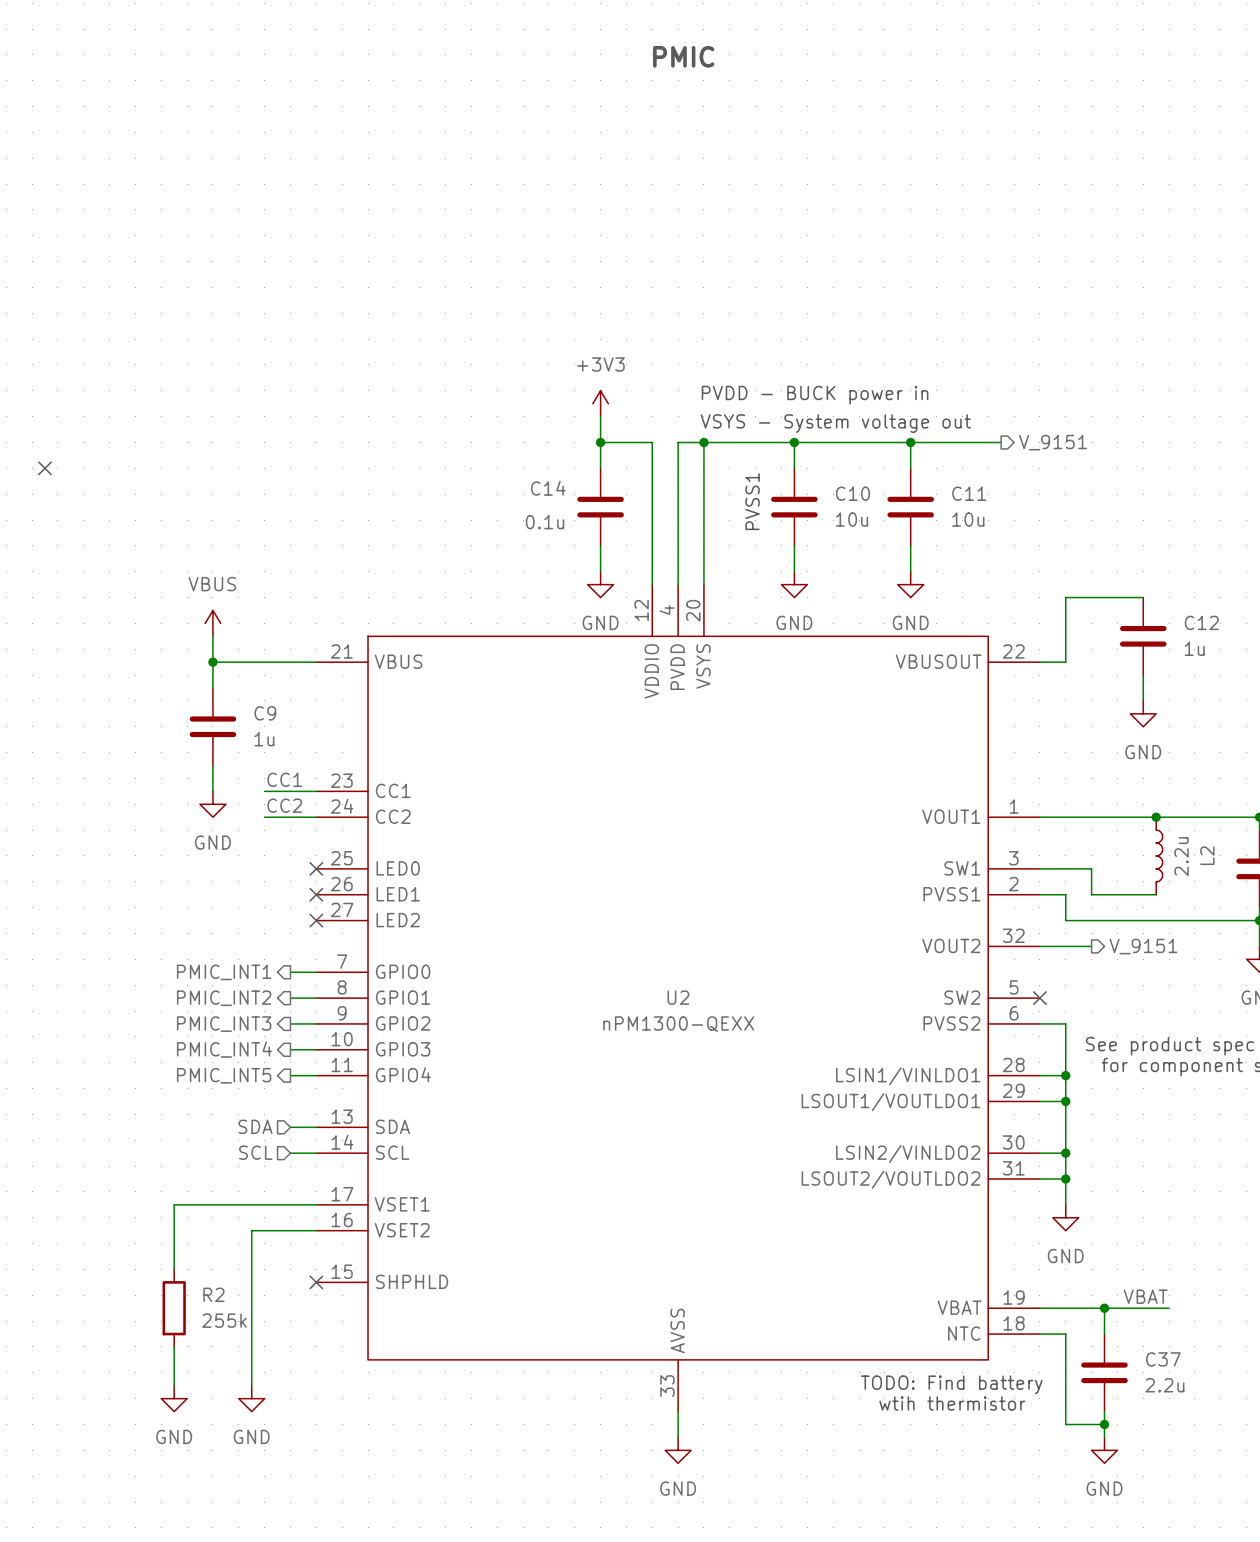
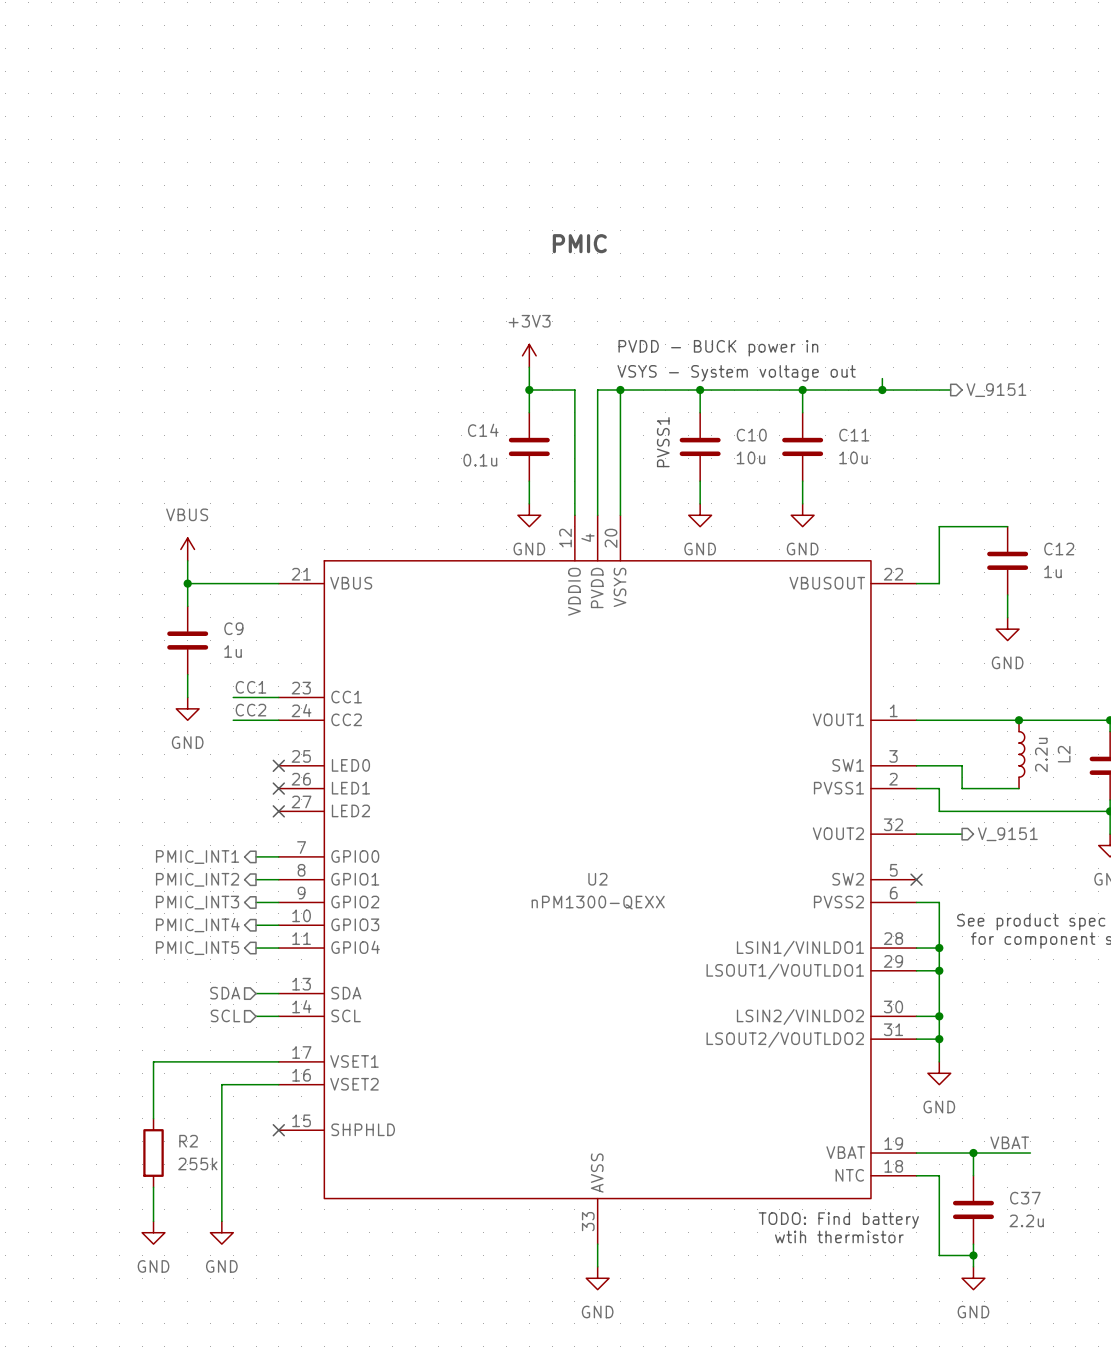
text position: PMIC (683, 56) -> PMIC (579, 243)
wire: none -> (882, 378) (882, 390) (950, 390)
junction: none -> (882, 390)
hierarchical label position: V_9151 (1053, 442) -> V_9151 (996, 390)
no-connect mark: (44, 468) -> none

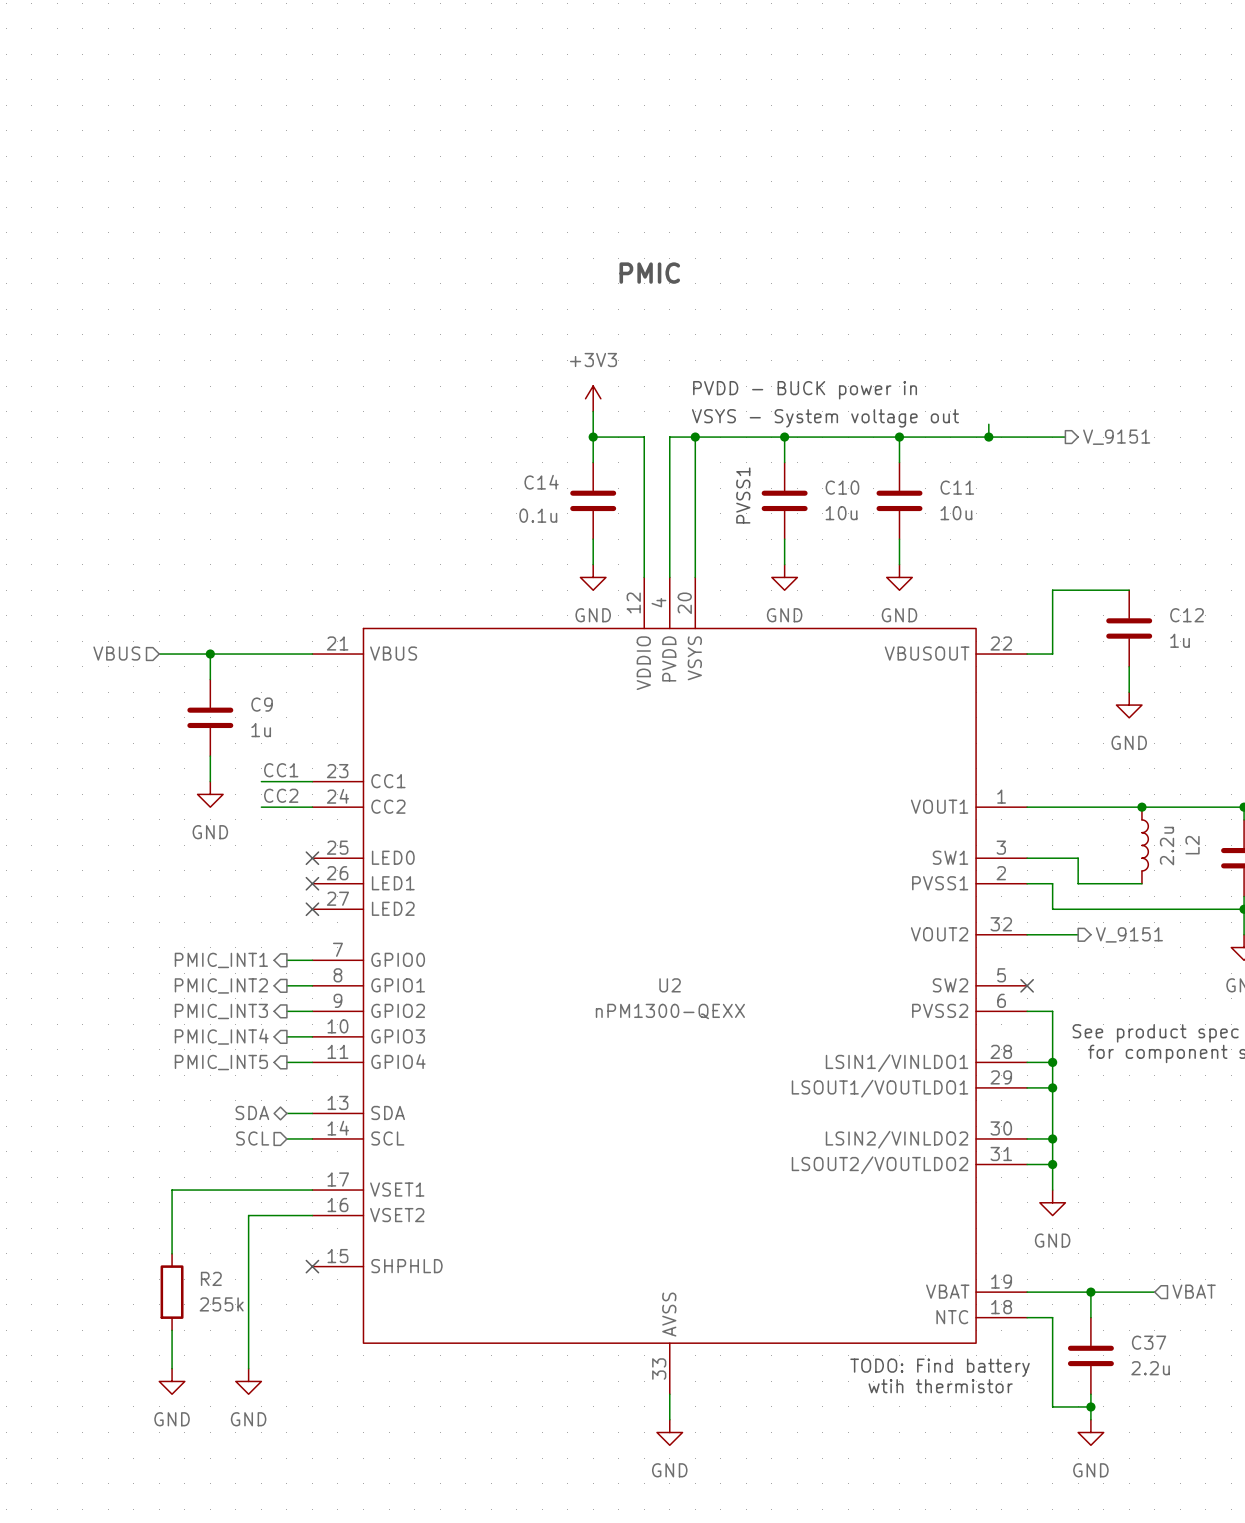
power symbol: VBUS (187, 549) -> none
wire: (187, 560) (187, 583) -> (159, 654) (210, 654)
hierarchical label: none -> VBUS (116, 653)
hierarchical label shape: input (225, 993) -> bidirectional (252, 1112)
label: VBAT (1009, 1142) -> none
hierarchical label: none -> VBAT (1194, 1291)

